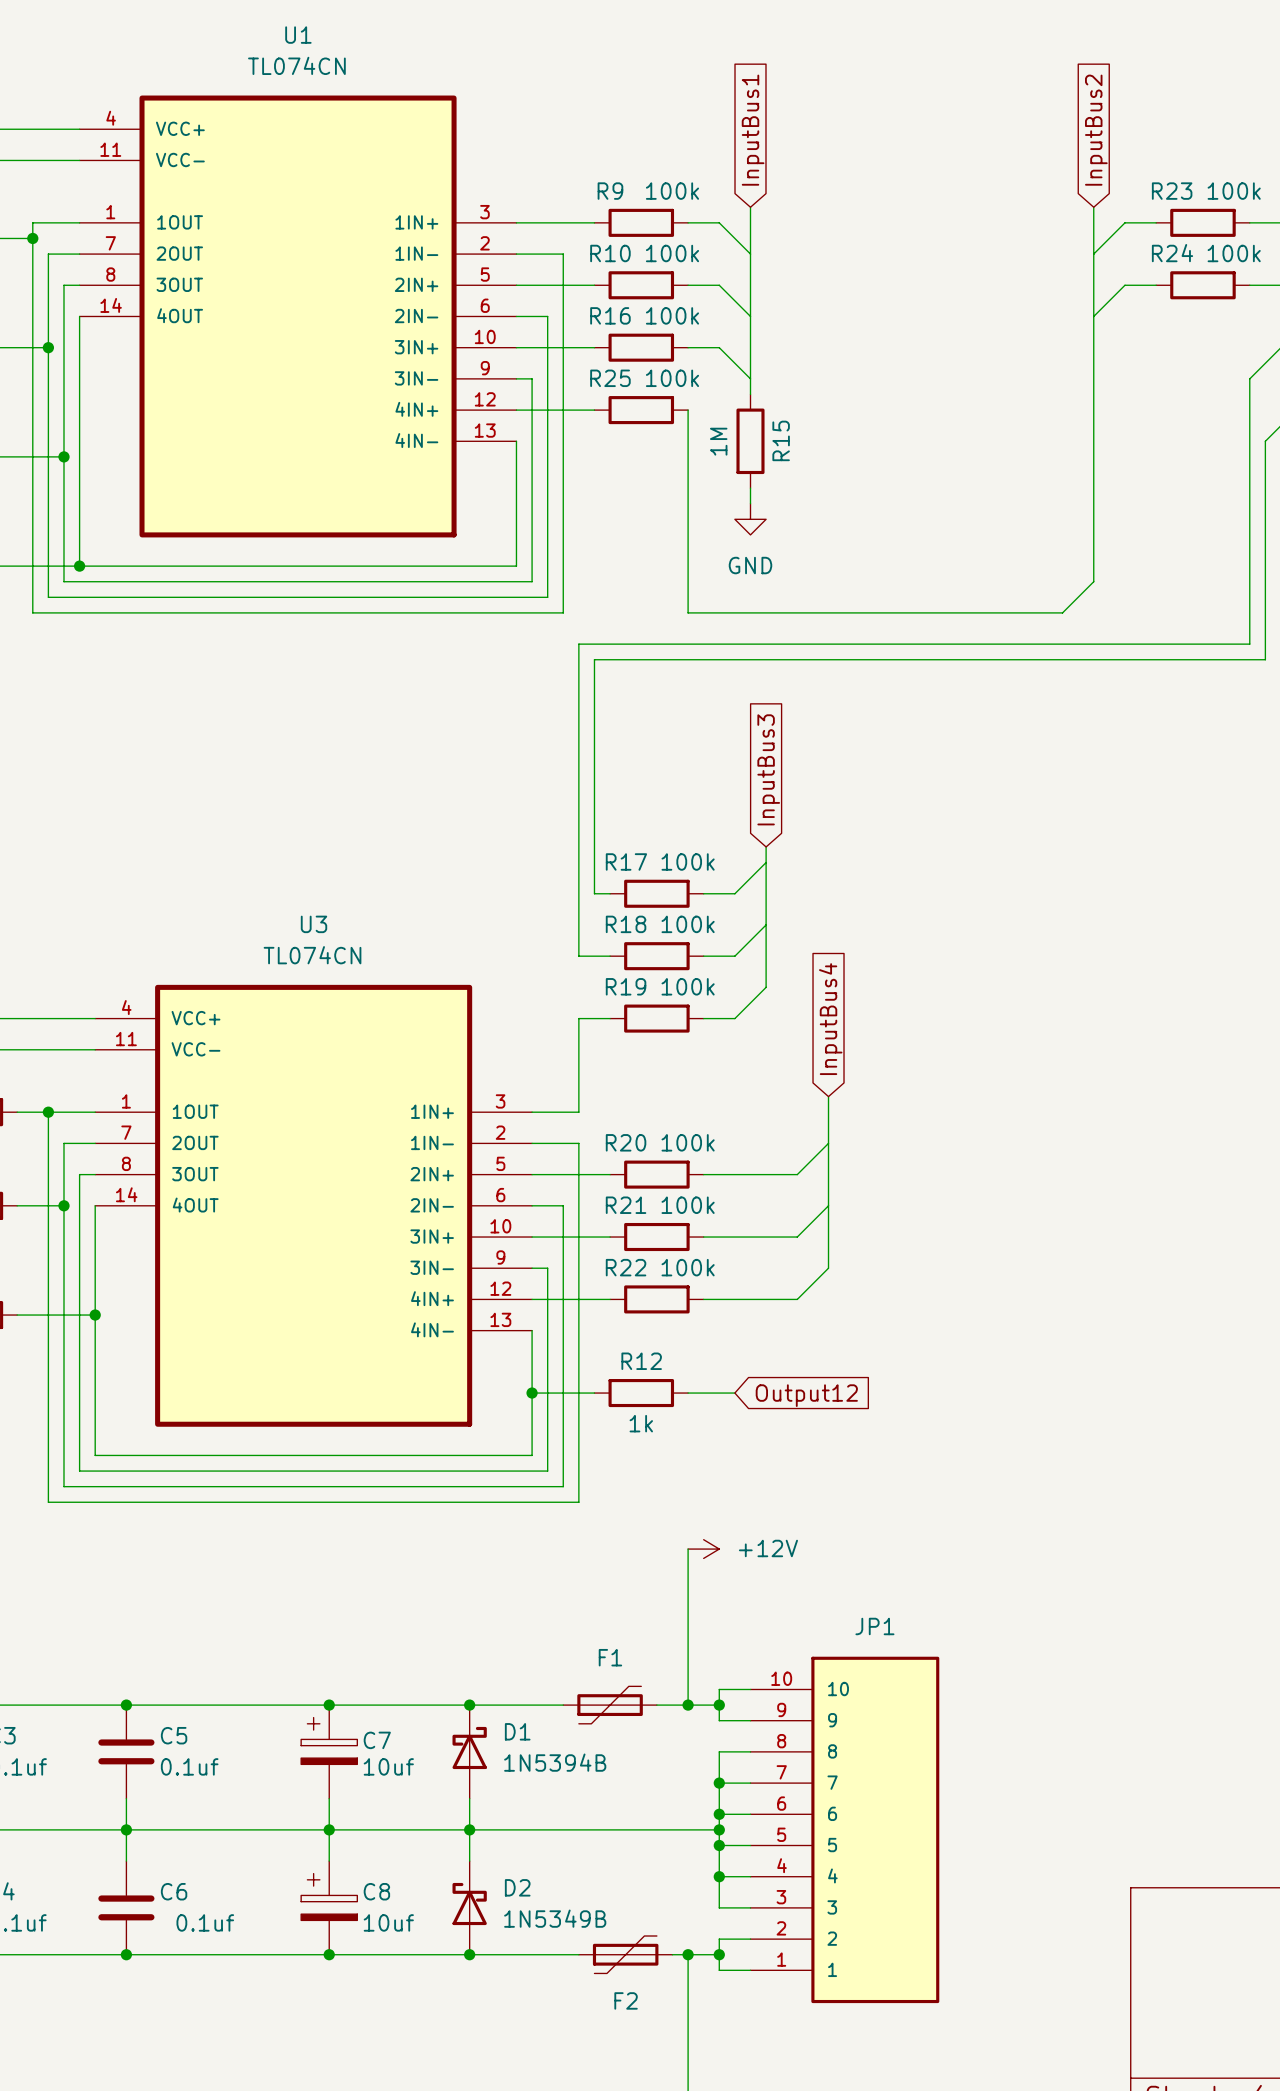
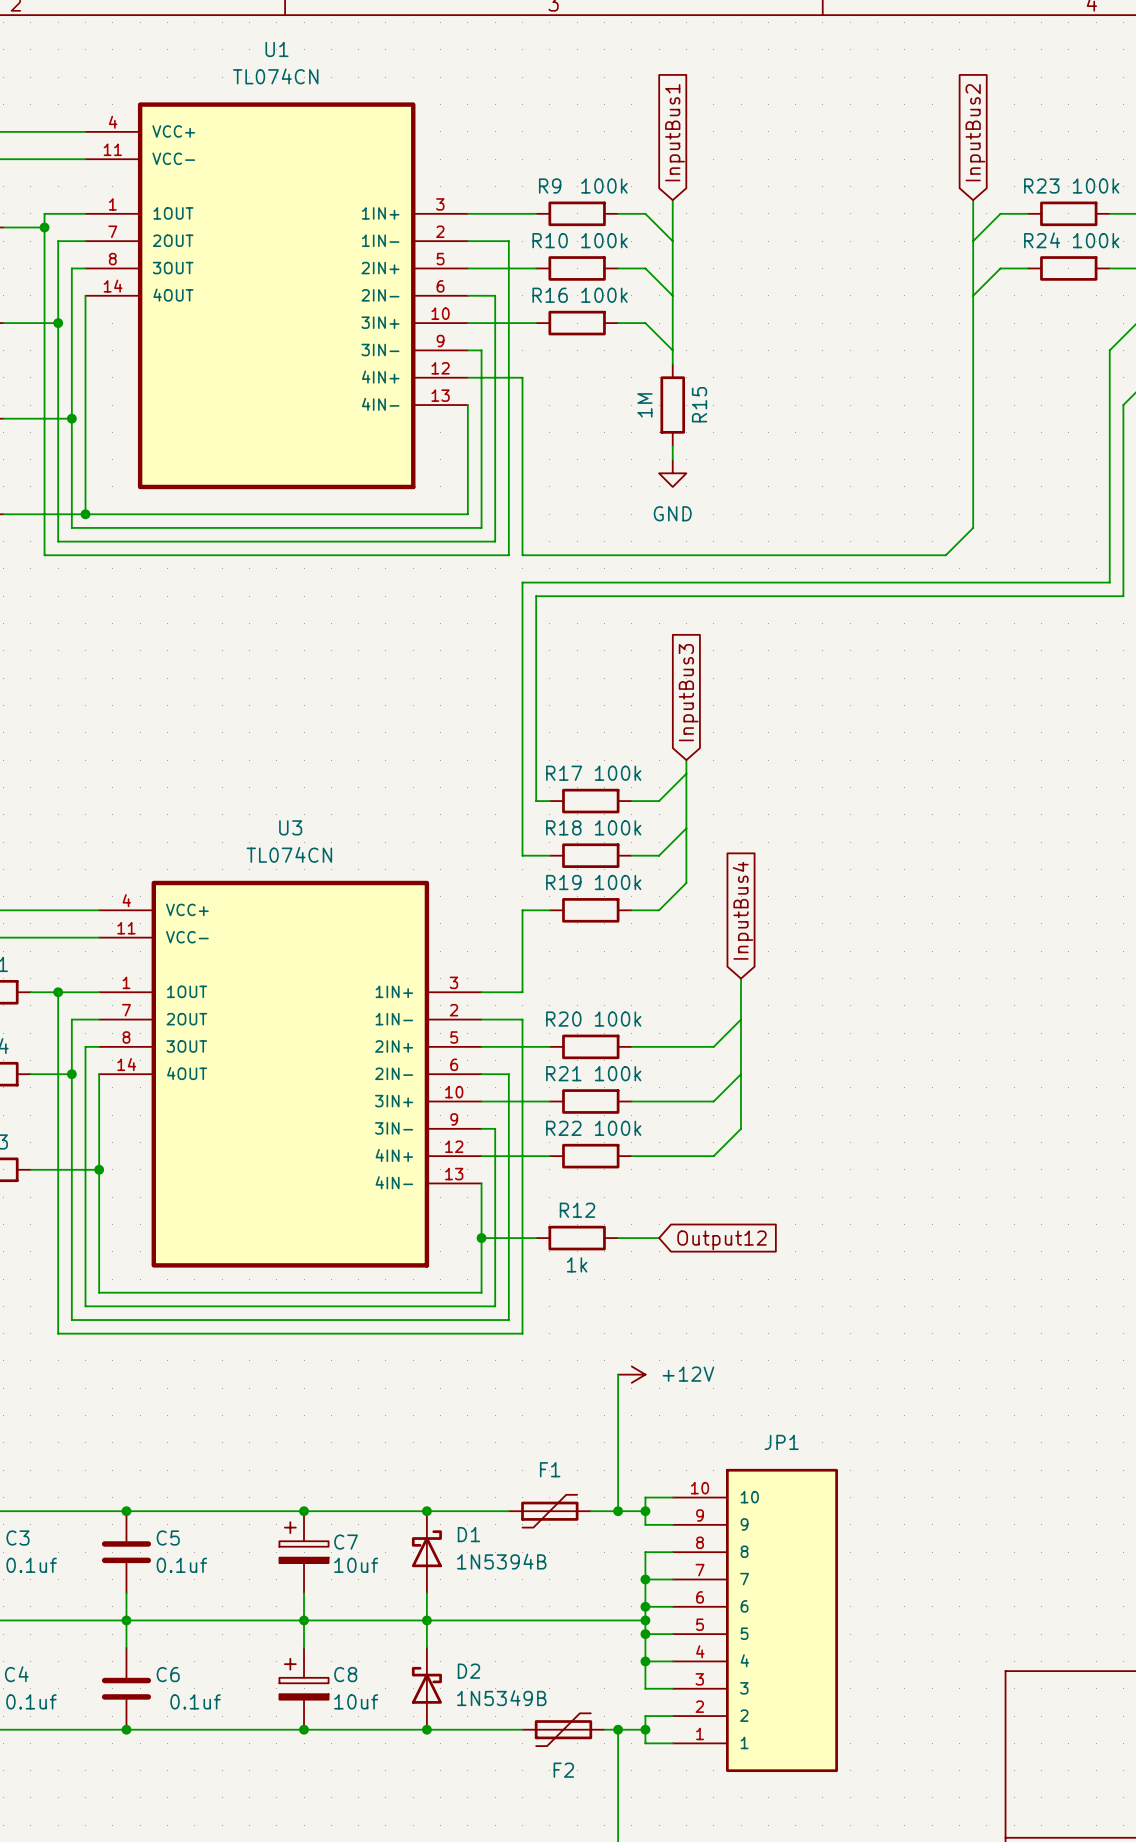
wire: (578, 410) (594, 410) -> none
R25: 100k (641, 410) -> none
wire: (688, 410) (688, 612) -> (522, 377) (522, 555) (618, 555)

